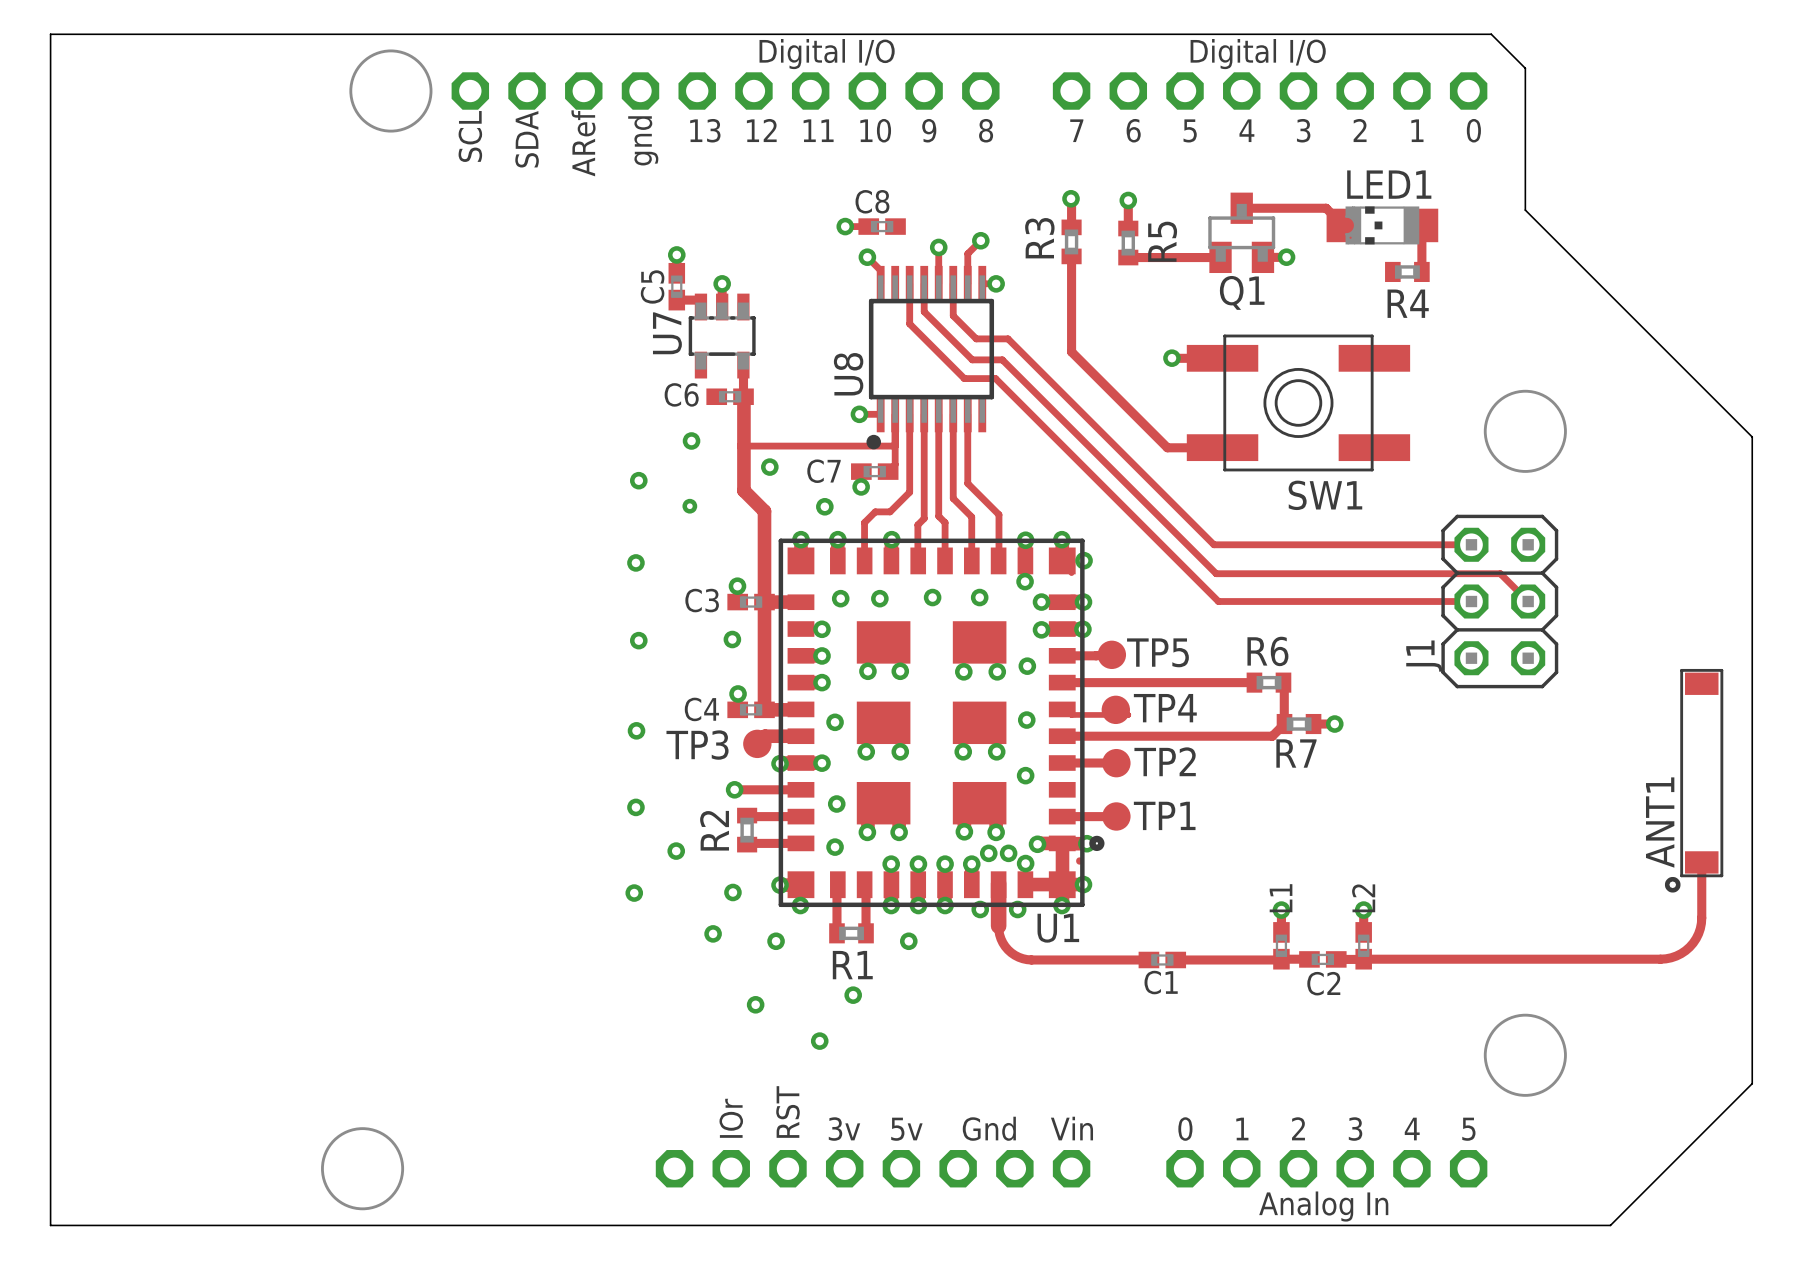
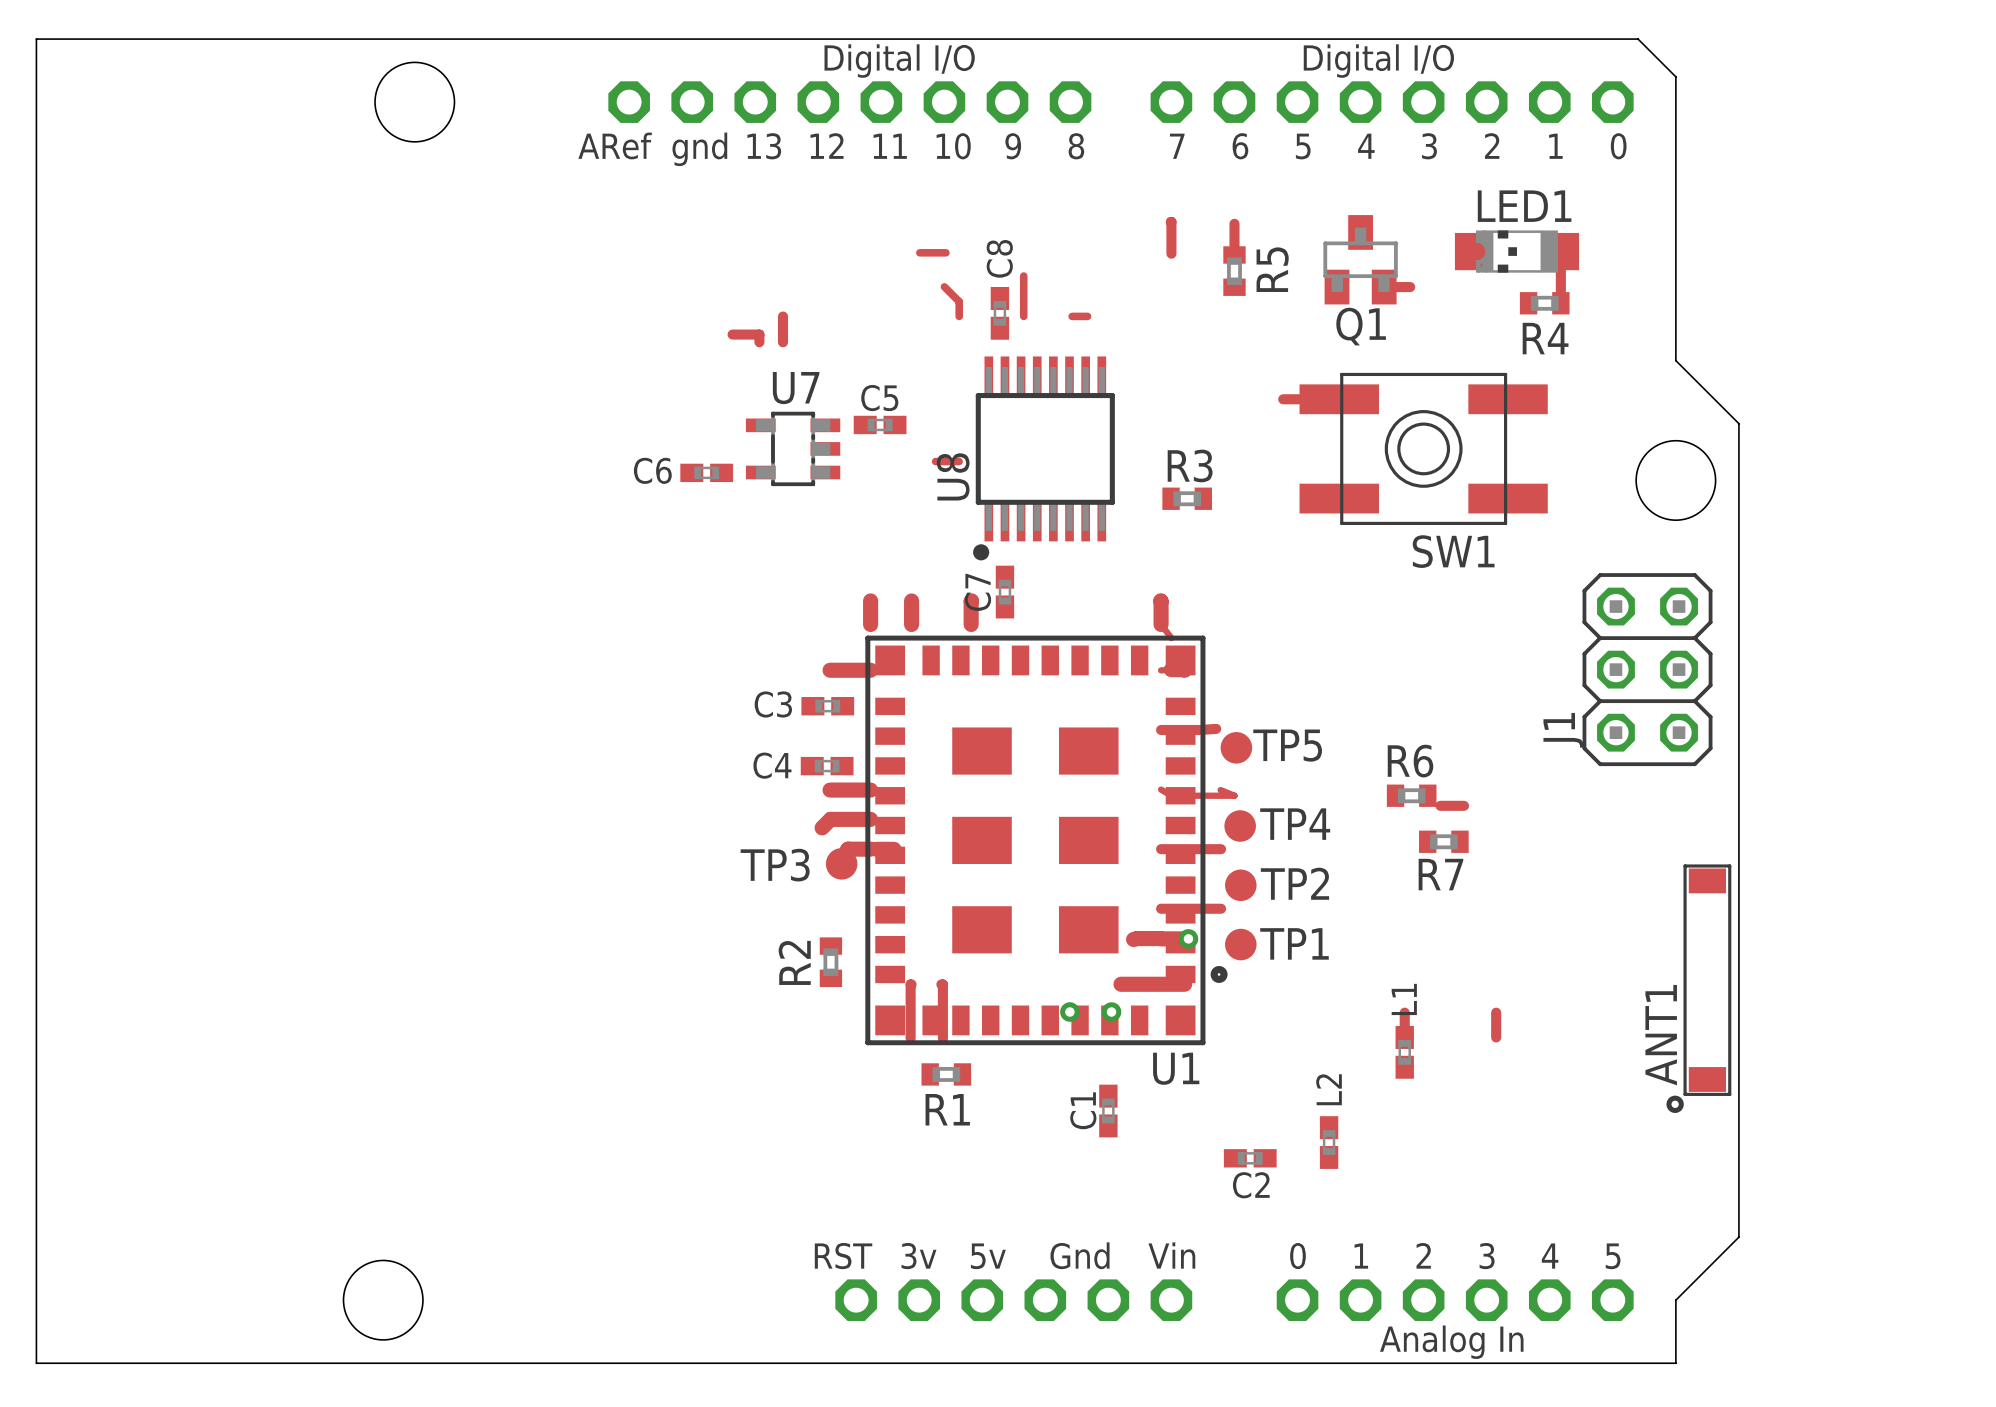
via: (1071, 198) -> none
via: (1128, 200) -> none
track: (1241, 208) (1326, 208) (1343, 225) -> none
via: (845, 226) -> none
C8 rotation: 0° (882, 226) -> 90° clockwise (999, 313)
C8 position: (882, 226) -> (999, 313)
track: (980, 240) (967, 253) (967, 283) -> none
via: (980, 240) -> none
R3 rotation: 0° (1071, 241) -> 90° clockwise (1187, 498)
R3 position: (1071, 241) -> (1187, 498)
via: (938, 247) -> none
via: (676, 254) -> none
track: (1071, 256) (1071, 351) (1167, 447) (1222, 447) -> none
via: (867, 257) -> none
track: (1128, 257) (1220, 257) -> none
via: (1286, 257) -> none
via: (722, 283) -> none
track: (909, 283) (909, 323) (964, 378) (995, 378) (1218, 601) (1471, 601) -> none
track: (924, 283) (924, 311) (972, 359) (1002, 359) (1216, 573) (1500, 573) (1528, 601) -> none
track: (953, 283) (953, 315) (976, 338) (1008, 338) (1213, 544) (1471, 544) -> none
via: (996, 283) -> none
C5 rotation: 0° (676, 286) -> 90° clockwise (880, 424)
C5 position: (676, 286) -> (880, 424)
U7 rotation: 0° (722, 336) -> 90° clockwise (793, 448)
U7 position: (722, 336) -> (793, 448)
U8 position: (930, 357) -> (1043, 458)
via: (1171, 358) -> none
track: (743, 365) (743, 490) (764, 511) (764, 709) -> none
C6 position: (730, 396) -> (706, 472)
via: (859, 414) -> none
track: (895, 414) (895, 464) (887, 471) -> none
track: (909, 414) (909, 492) (890, 511) (875, 511) (864, 522) (864, 560) -> none
track: (924, 414) (924, 518) (917, 524) (918, 560) -> none
track: (938, 414) (938, 516) (945, 522) (945, 560) -> none
track: (953, 414) (953, 498) (971, 516) (971, 560) -> none
track: (967, 414) (967, 483) (998, 514) (998, 560) -> none
via: (691, 440) -> none
track: (743, 446) (895, 446) -> none
via: (769, 467) -> none
C7 rotation: 0° (874, 471) -> 90° clockwise (1004, 592)
C7 position: (874, 471) -> (1004, 592)
via: (638, 480) -> none
via: (861, 486) -> none
via: (689, 506) -> none
via: (824, 506) -> none
via: (801, 539) -> none
via: (837, 539) -> none
via: (891, 539) -> none
via: (1061, 539) -> none
via: (1025, 540) -> none
via: (1084, 560) -> none
via: (635, 562) -> none
via: (1025, 581) -> none
via: (737, 586) -> none
via: (932, 597) -> none
via: (979, 597) -> none
via: (840, 598) -> none
via: (879, 598) -> none
C3 position: (751, 602) -> (827, 706)
via: (1041, 602) -> none
via: (1083, 602) -> none
part: none -> (887, 701)
via: (822, 629) -> none
part: (901, 629) -> none
via: (1041, 629) -> none
via: (1082, 629) -> none
via: (732, 639) -> none
via: (638, 640) -> none
TP5 position: (1111, 654) -> (1236, 747)
via: (822, 655) -> none
via: (1027, 666) -> none
via: (867, 671) -> none
via: (900, 671) -> none
via: (963, 671) -> none
via: (997, 671) -> none
via: (822, 682) -> none
track: (1062, 682) (1254, 682) -> none
R6 position: (1268, 682) -> (1411, 795)
track: (1283, 682) (1284, 724) -> none
via: (738, 693) -> none
C4 position: (751, 709) -> (827, 766)
TP4 position: (1115, 709) -> (1240, 826)
via: (1026, 720) -> none
via: (835, 722) -> none
U1 position: (941, 722) -> (1046, 840)
track: (1284, 724) (1272, 736) (1062, 736) -> none
R7 position: (1299, 724) -> (1443, 841)
via: (1334, 724) -> none
via: (636, 730) -> none
TP3 position: (757, 743) -> (841, 863)
via: (866, 751) -> none
via: (900, 751) -> none
via: (963, 751) -> none
via: (996, 751) -> none
via: (780, 763) -> none
via: (822, 763) -> none
TP2 position: (1116, 763) -> (1240, 885)
via: (1025, 775) -> none
ANT1 position: (1694, 780) -> (1698, 988)
track: (734, 789) (800, 789) -> none
via: (734, 789) -> none
via: (836, 804) -> none
via: (635, 807) -> none
track: (747, 815) (800, 816) -> none
TP1 position: (1116, 816) -> (1240, 944)
R2 position: (747, 830) -> (830, 962)
via: (964, 831) -> none
via: (867, 832) -> none
via: (899, 832) -> none
via: (996, 832) -> none
track: (800, 843) (747, 844) -> none
via: (1037, 844) -> none
track: (1062, 845) (1062, 885) -> none
via: (835, 847) -> none
via: (676, 851) -> none
via: (988, 853) -> none
via: (1008, 853) -> none
track: (1079, 860) (1079, 861) -> none
track: (1701, 862) (1700, 928) (1689, 947) (1671, 957) (1336, 959) -> none
via: (1025, 863) -> none
via: (891, 864) -> none
via: (918, 864) -> none
via: (945, 864) -> none
via: (971, 864) -> none
track: (998, 884) (999, 934) (1008, 949) (1018, 957) (1031, 959) (1148, 959) -> none
via: (1083, 884) -> none
via: (780, 885) -> none
via: (732, 892) -> none
via: (634, 893) -> none
via: (800, 905) -> none
via: (891, 905) -> none
via: (918, 905) -> none
via: (945, 905) -> none
via: (1061, 905) -> none
via: (1281, 910) -> none
via: (1363, 910) -> none
via: (713, 933) -> none
R1 position: (851, 933) -> (946, 1074)
via: (776, 941) -> none
via: (908, 941) -> none
L2 position: (1363, 945) -> (1329, 1142)
C1 rotation: 0° (1162, 959) -> 90° clockwise (1108, 1111)
C1 position: (1162, 959) -> (1108, 1111)
track: (1309, 959) (1175, 959) -> none
C2 position: (1322, 959) -> (1250, 1158)
via: (853, 995) -> none
via: (755, 1004) -> none
via: (819, 1041) -> none

